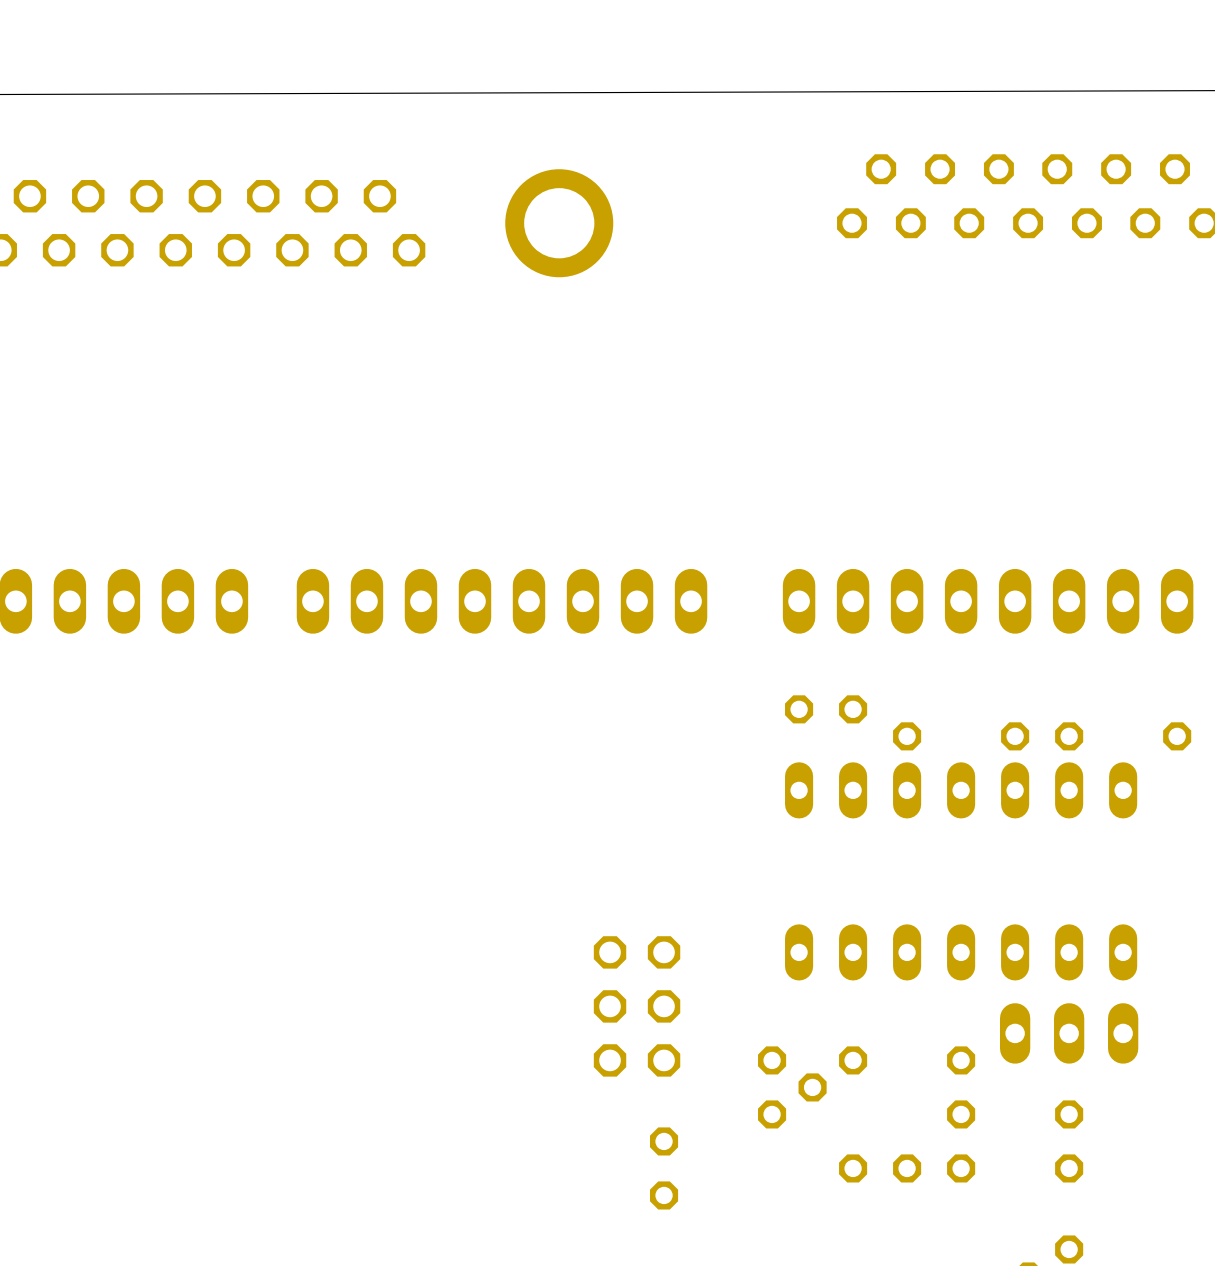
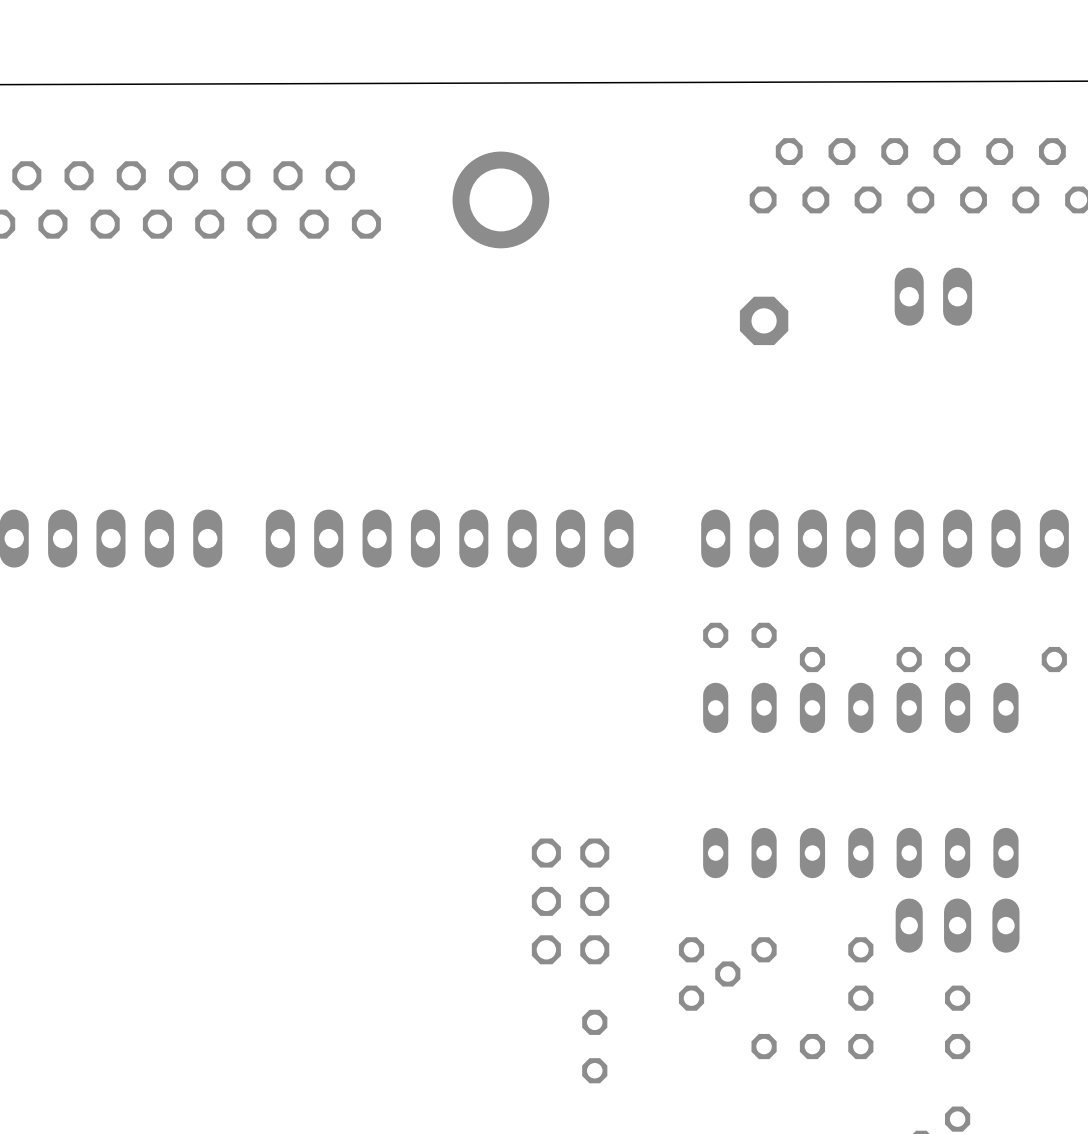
part: none -> (933, 296)
part: none -> (764, 320)

